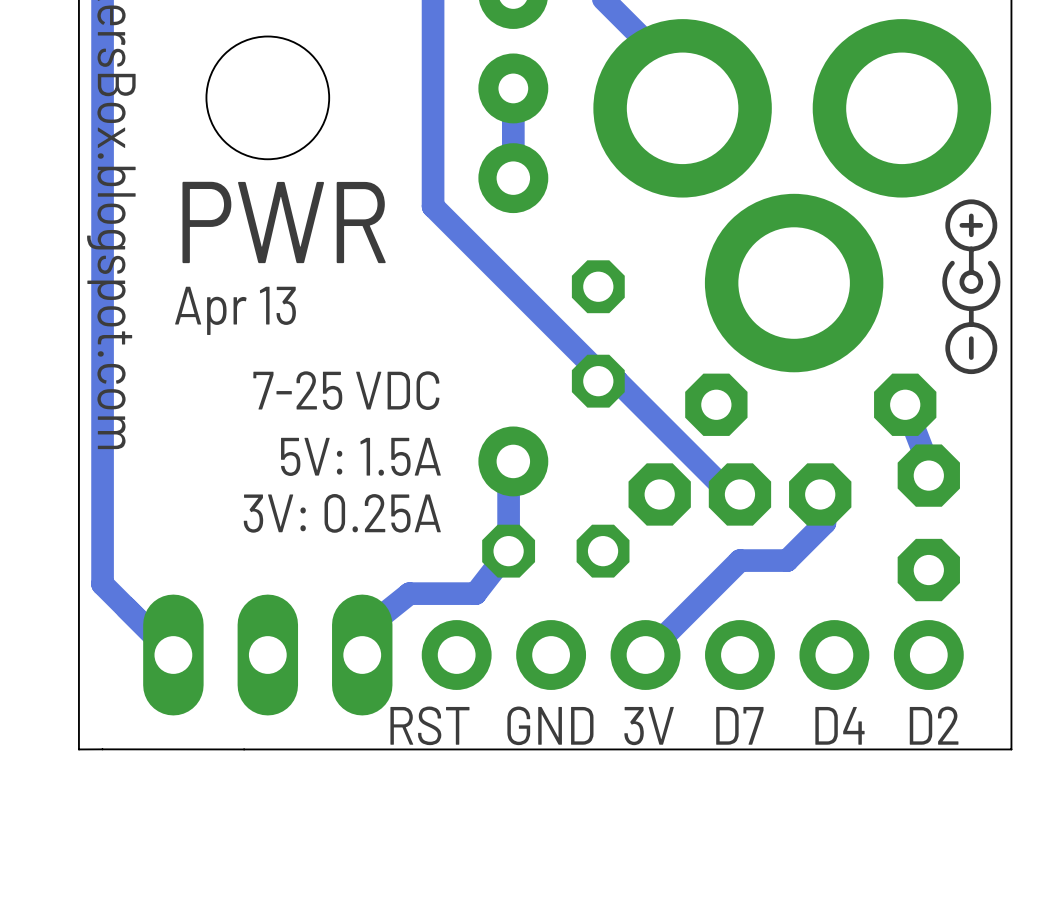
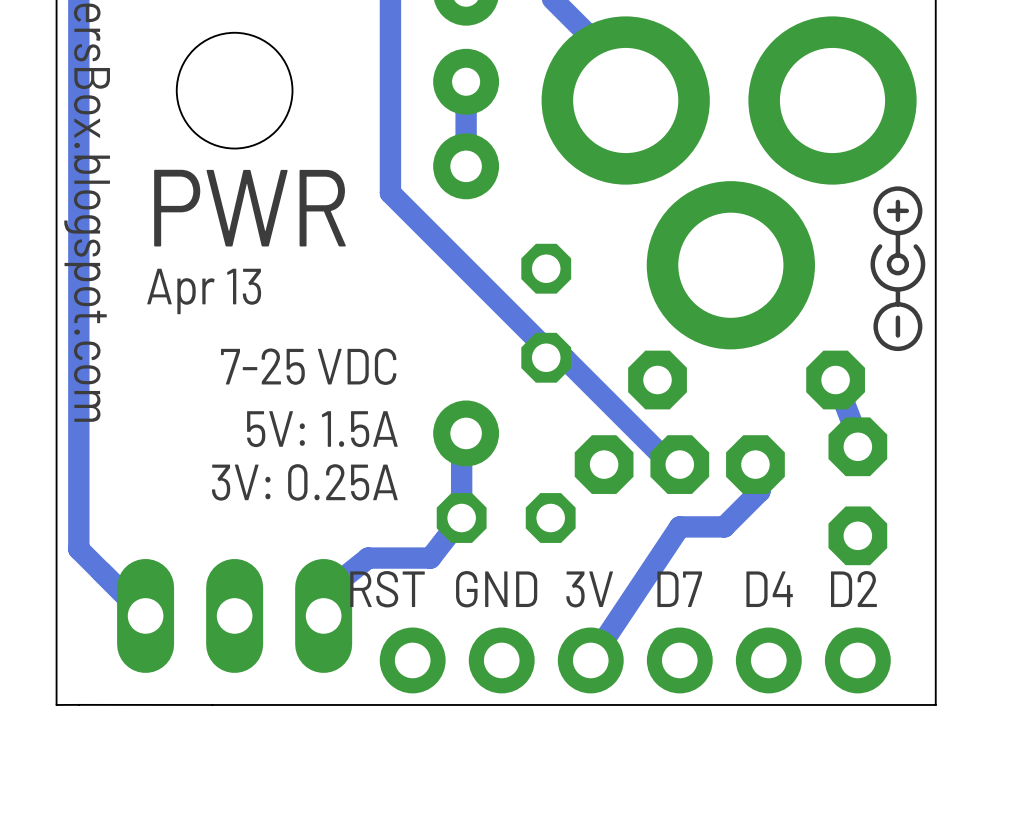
track: (739, 560) (645, 655) -> (679, 526) (590, 660)
part position: (692, 655) -> (635, 660)
text position: RST (429, 725) -> RST (387, 589)
text position: GND (550, 725) -> GND (496, 589)
text position: D7 (739, 725) -> D7 (679, 589)
text position: D4 (839, 725) -> D4 (769, 589)
text position: D2 (934, 725) -> D2 (853, 589)
text position: 3V (649, 726) -> 3V (589, 589)

